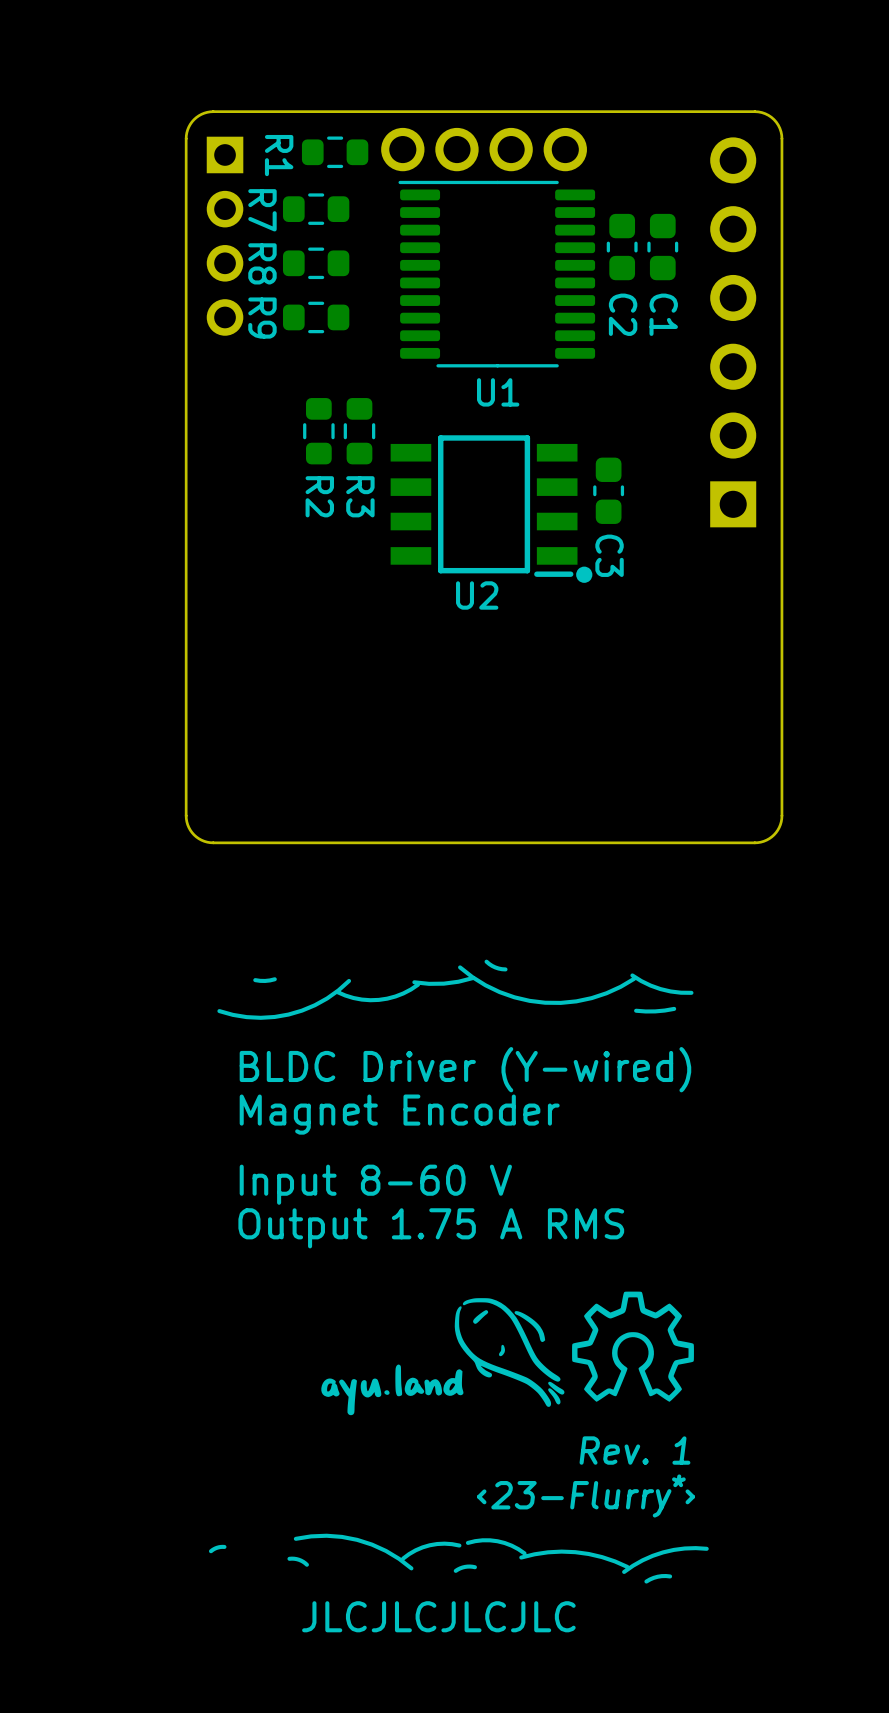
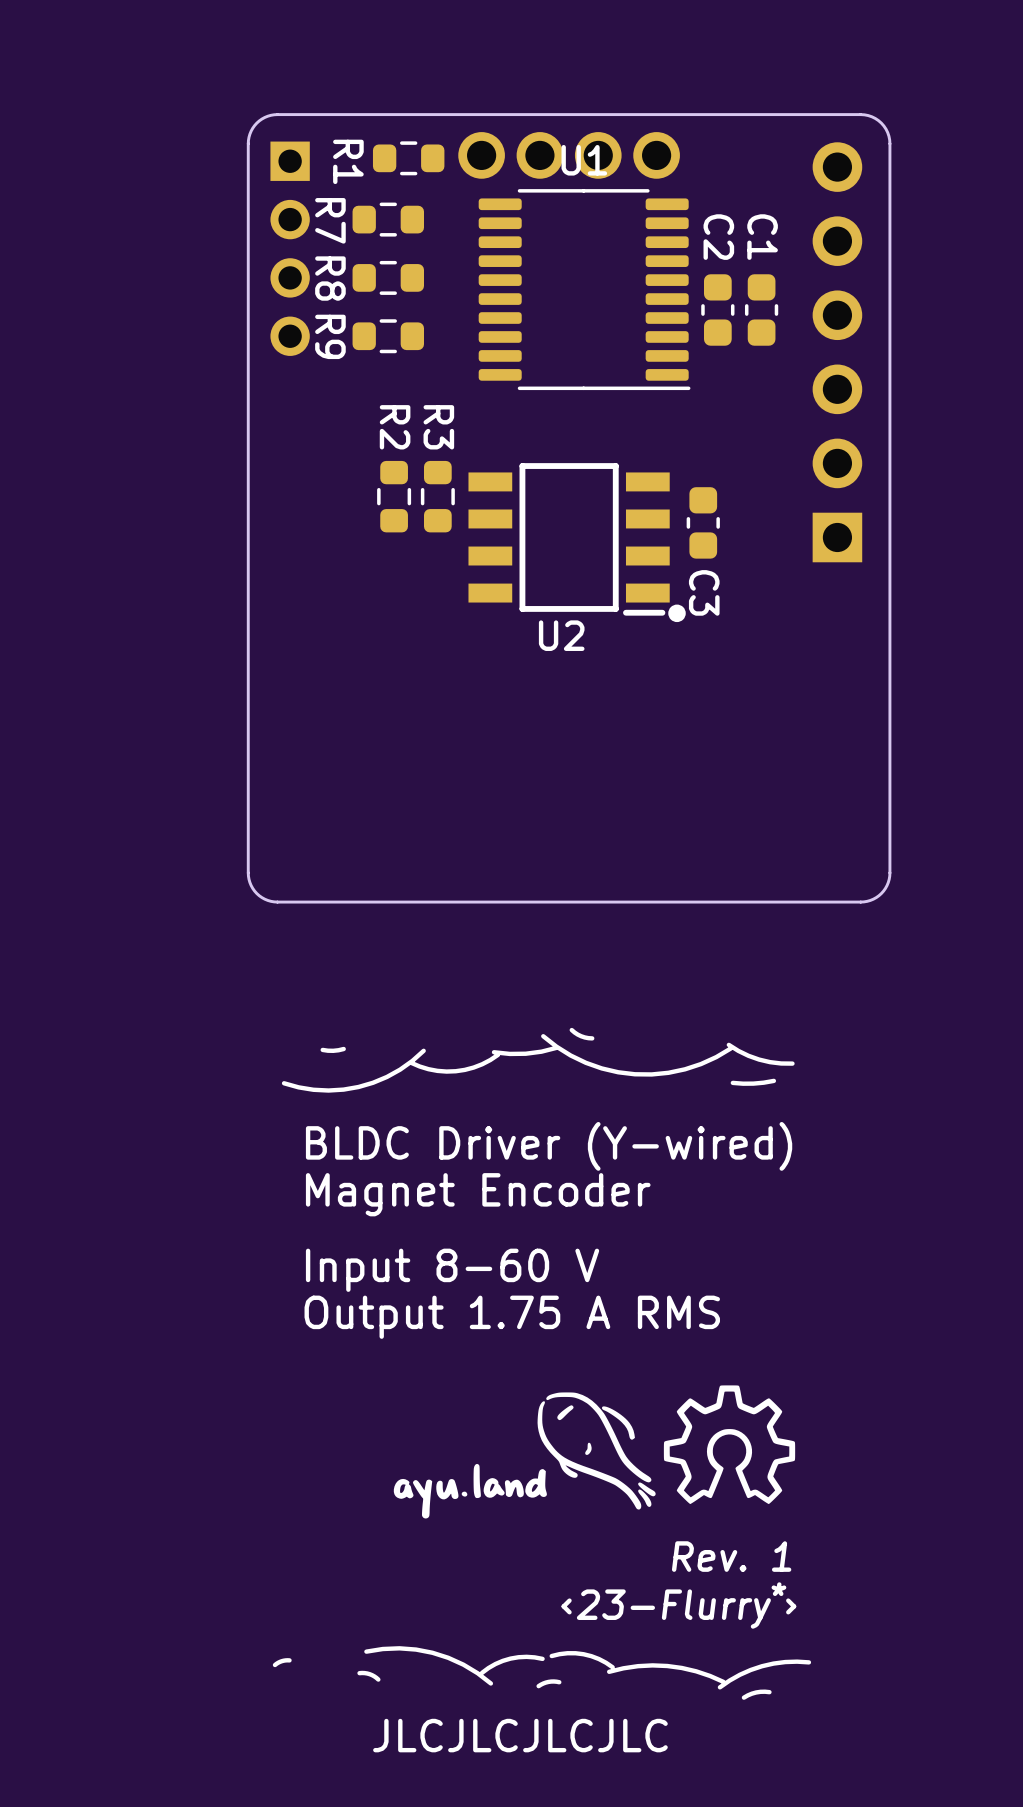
C2 position: (622, 247) -> (717, 309)
C1 position: (662, 247) -> (761, 309)
U1 rotation: 0° (496, 274) -> 180° (584, 289)
C2 name position: C2 (623, 314) -> C2 (718, 237)
C1 name position: C1 (663, 314) -> C1 (762, 237)
R2 position: (318, 431) -> (394, 496)
R3 position: (359, 431) -> (437, 496)
R2 name position: R2 (319, 496) -> R2 (395, 427)
R3 name position: R3 (360, 496) -> R3 (438, 427)

